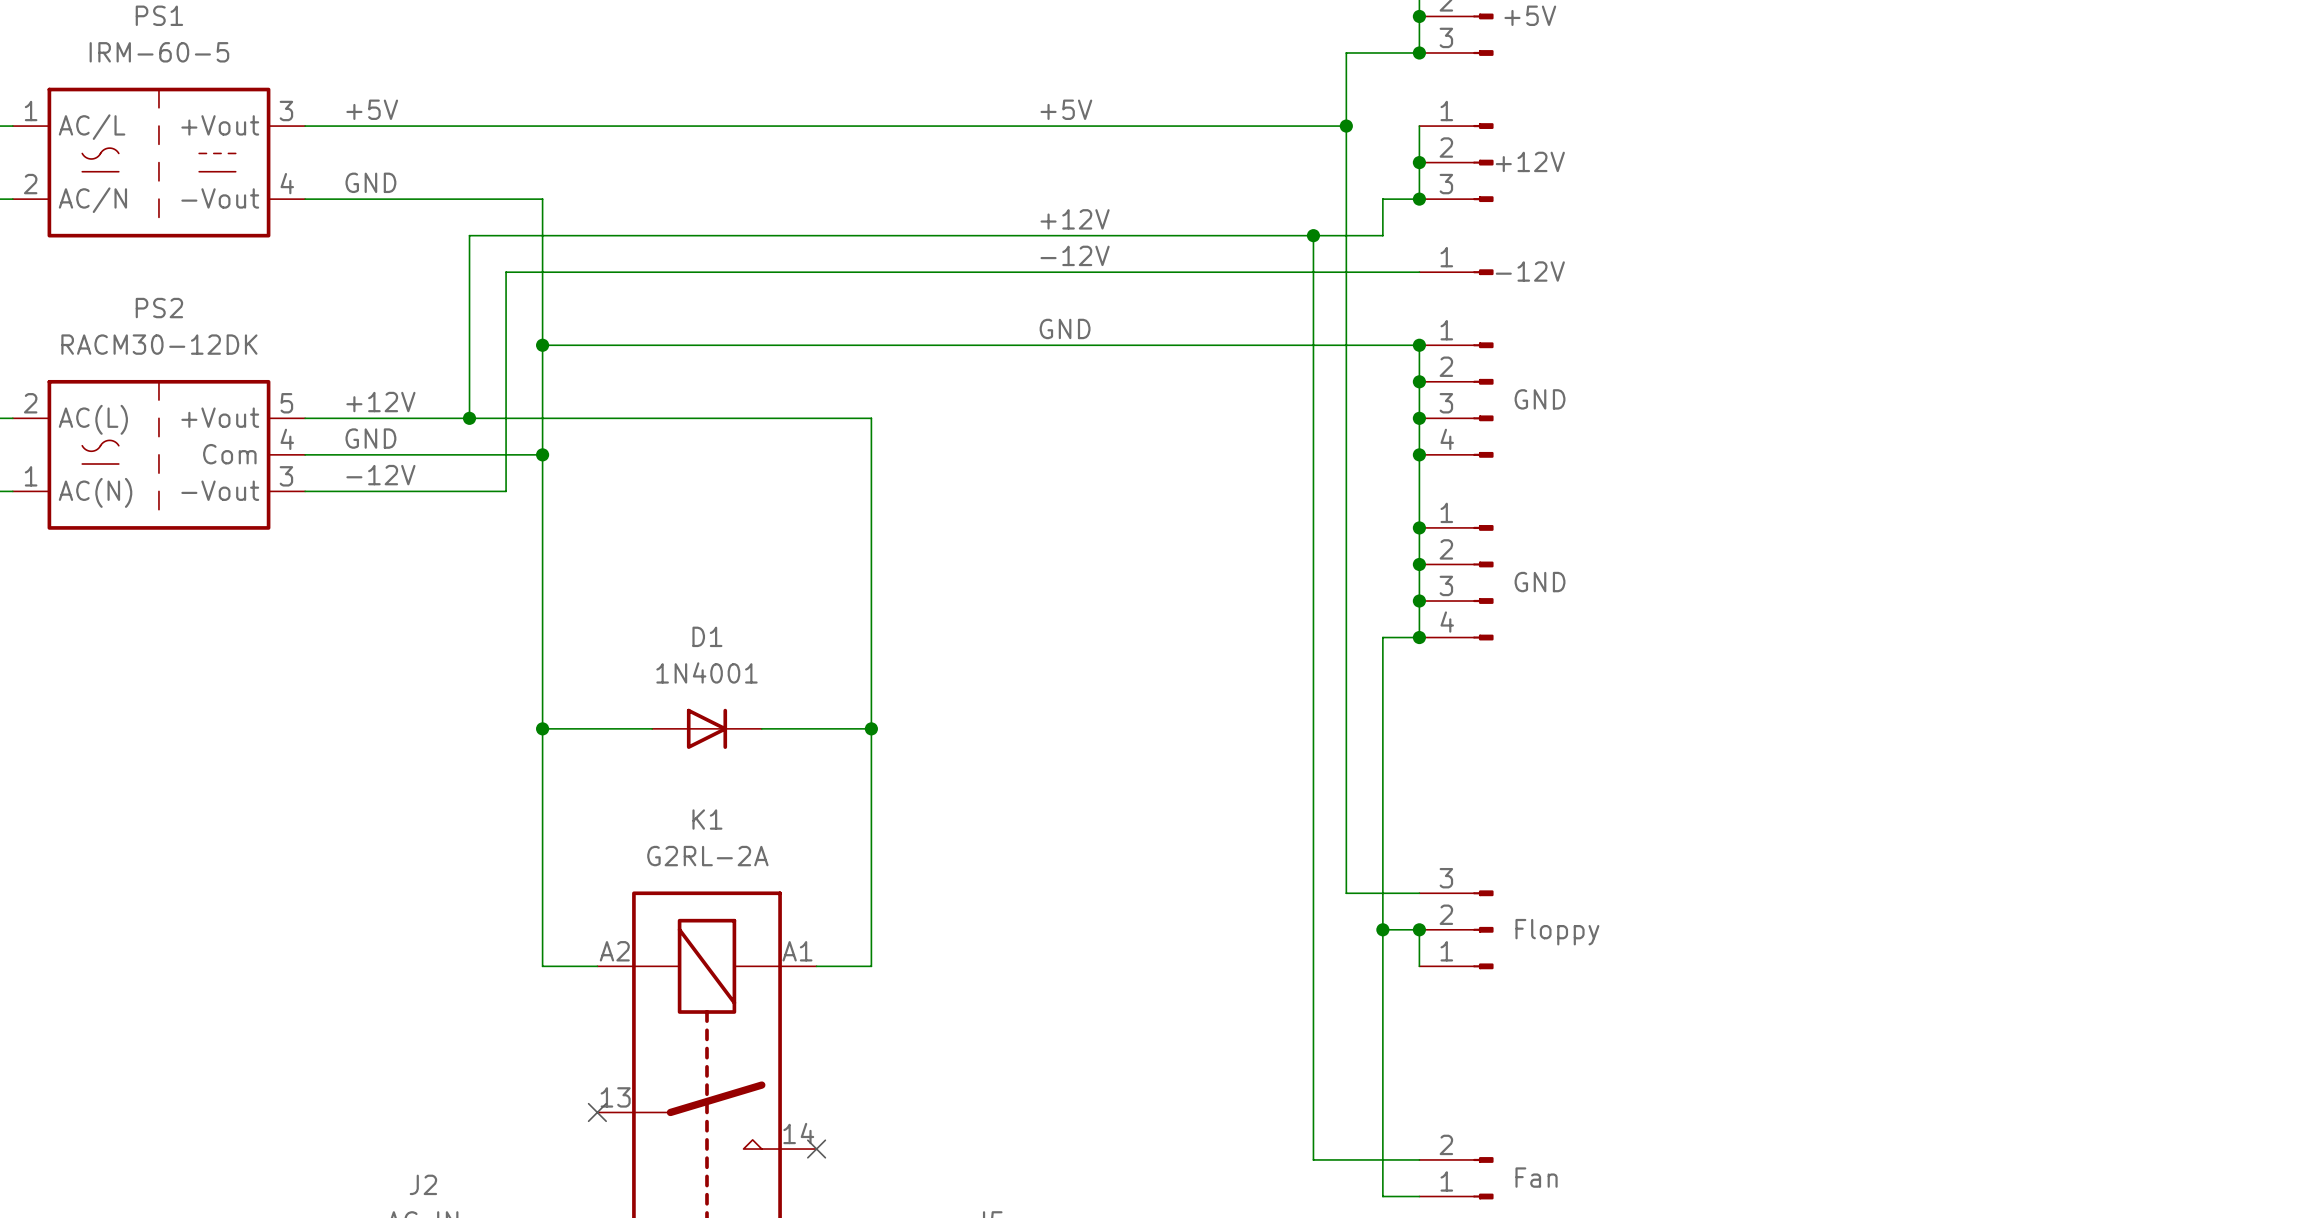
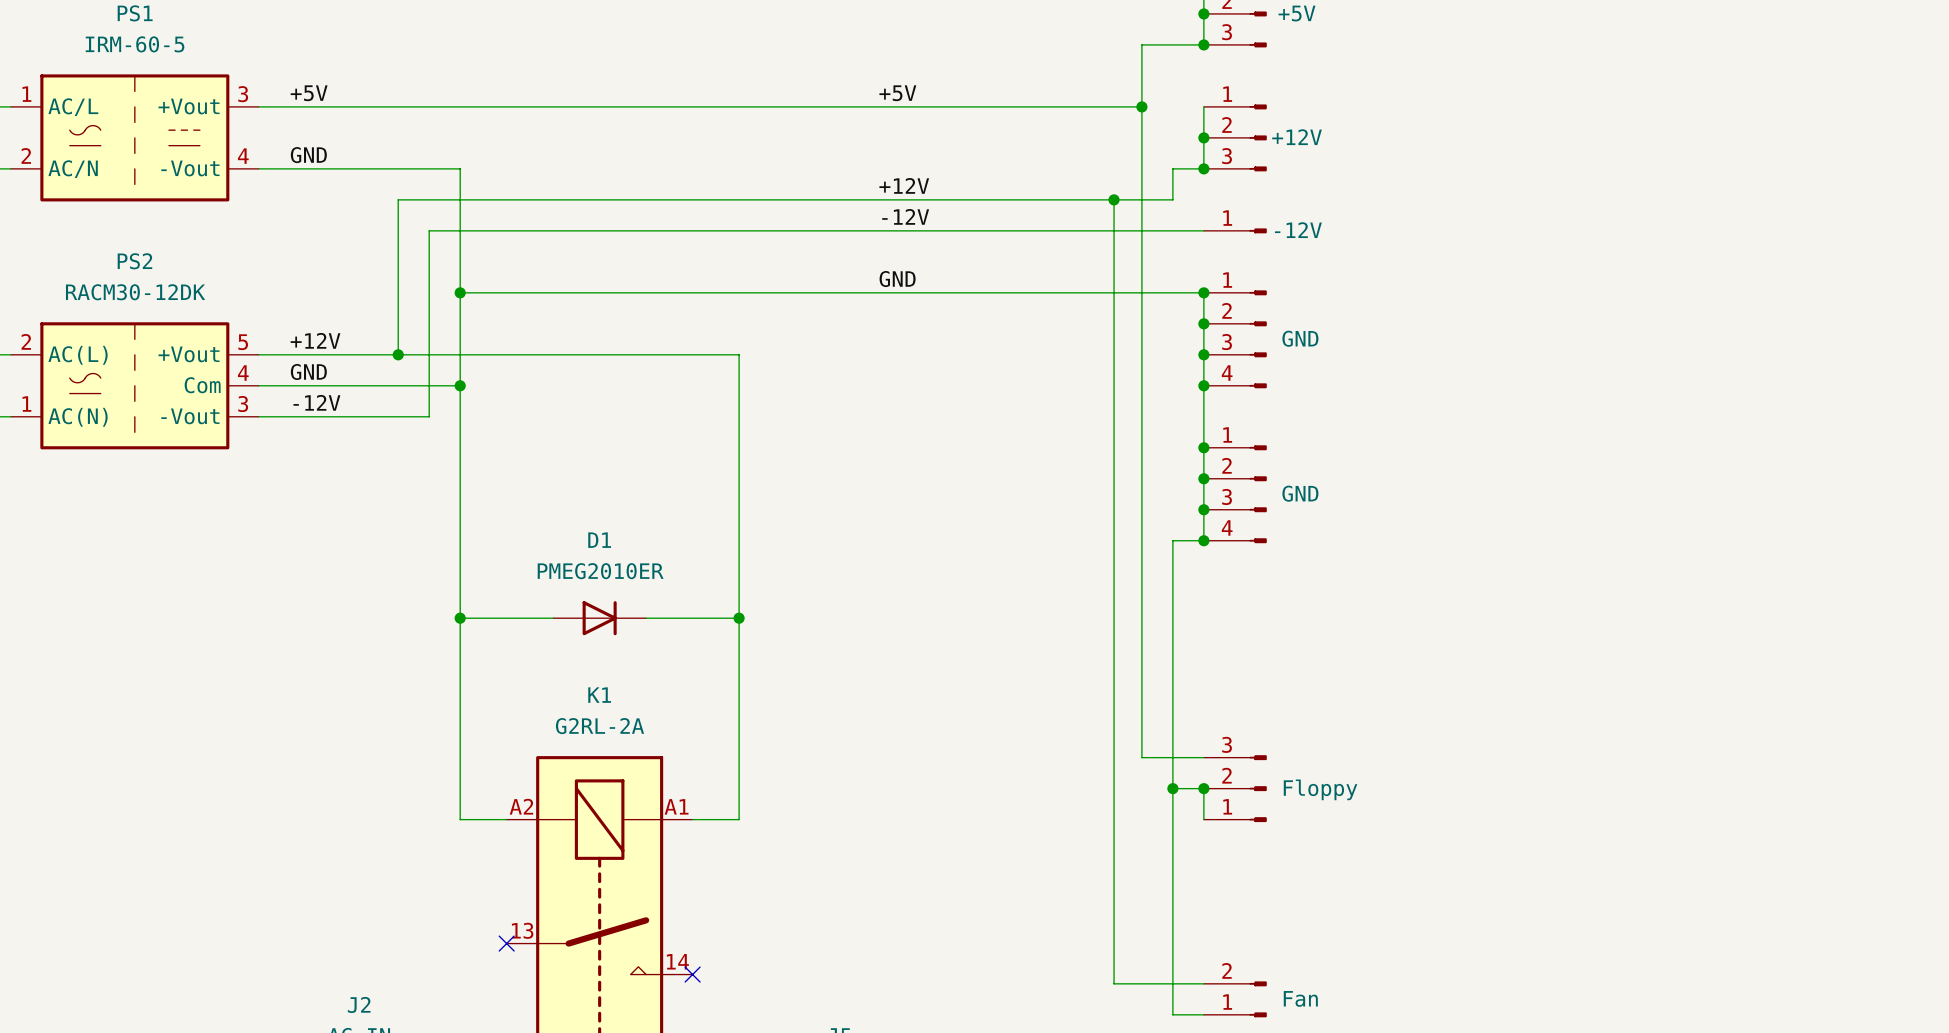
D1 value: 1N4001 (706, 672) -> PMEG2010ER (600, 571)

